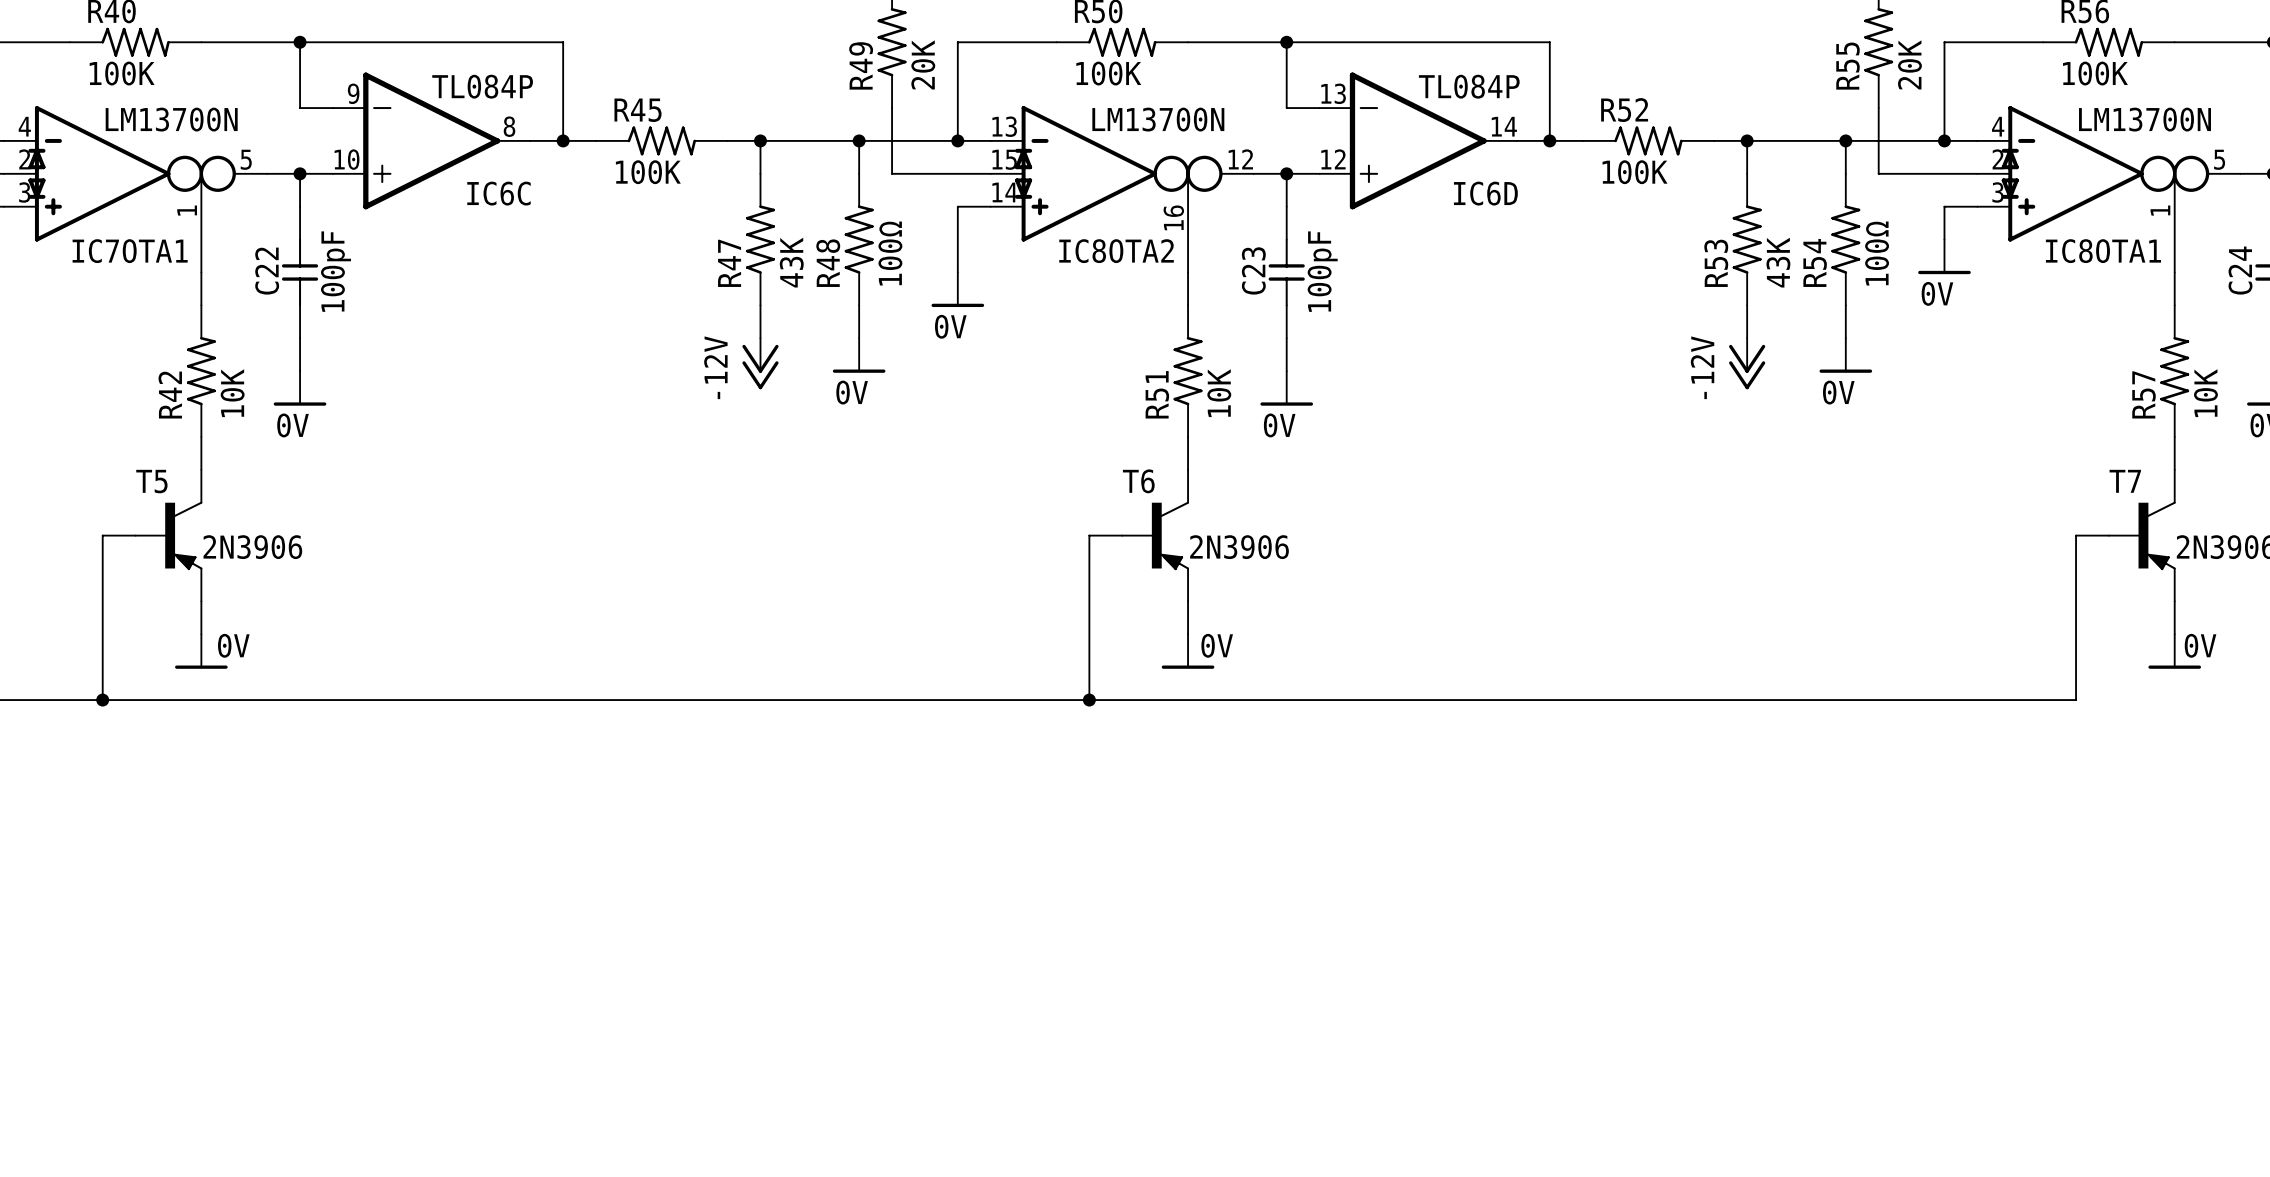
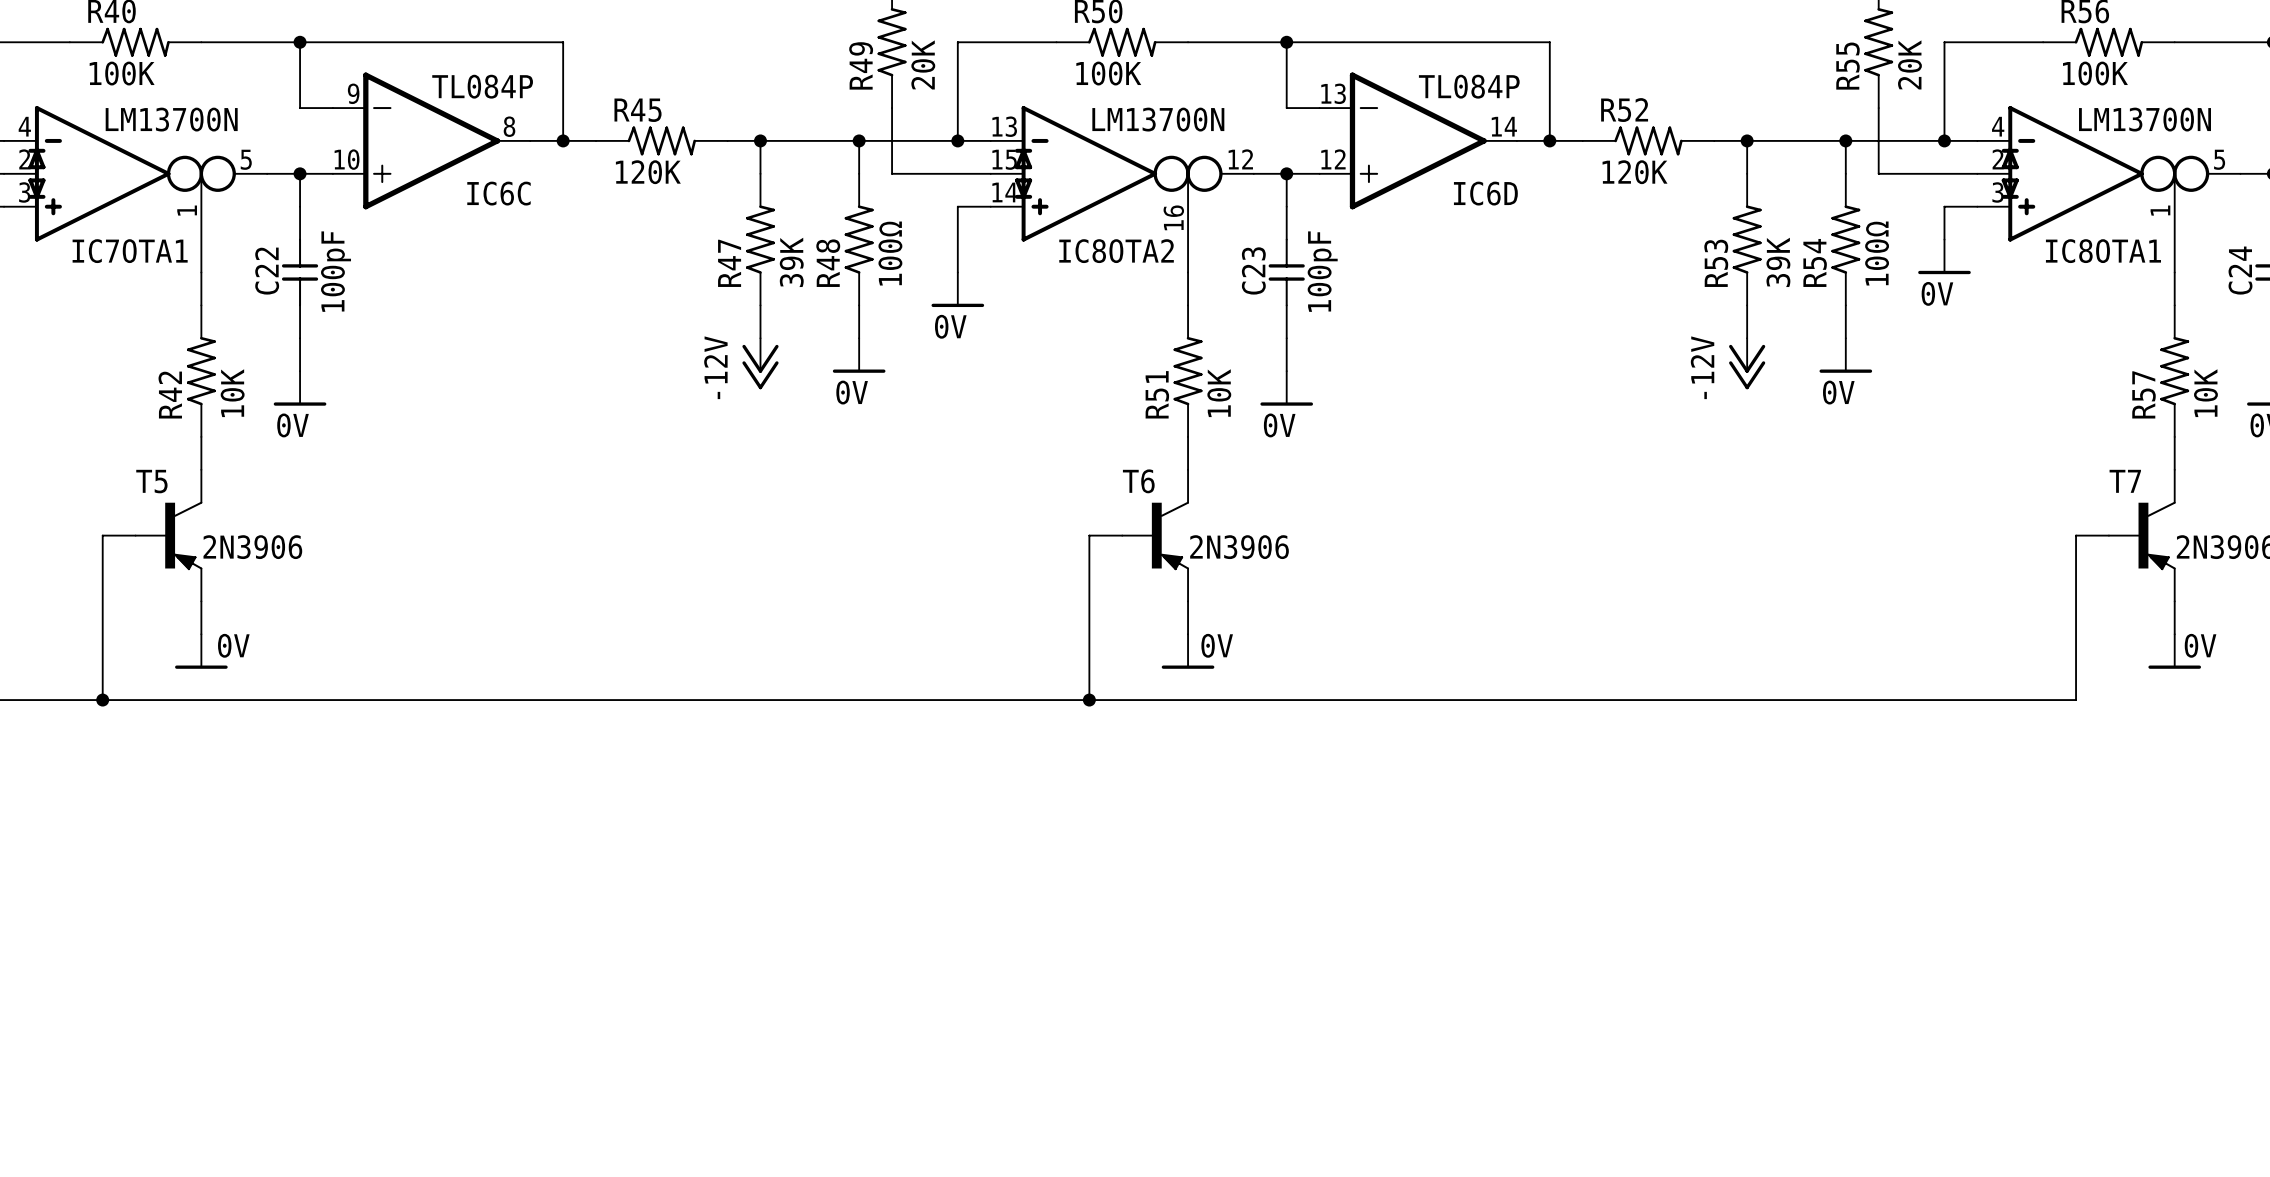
R45 value: 100K (648, 172) -> 120K (648, 172)
R52 value: 100K (1635, 172) -> 120K (1635, 172)
R47 value: 43K (791, 262) -> 39K (791, 262)
R53 value: 43K (1778, 262) -> 39K (1778, 262)

